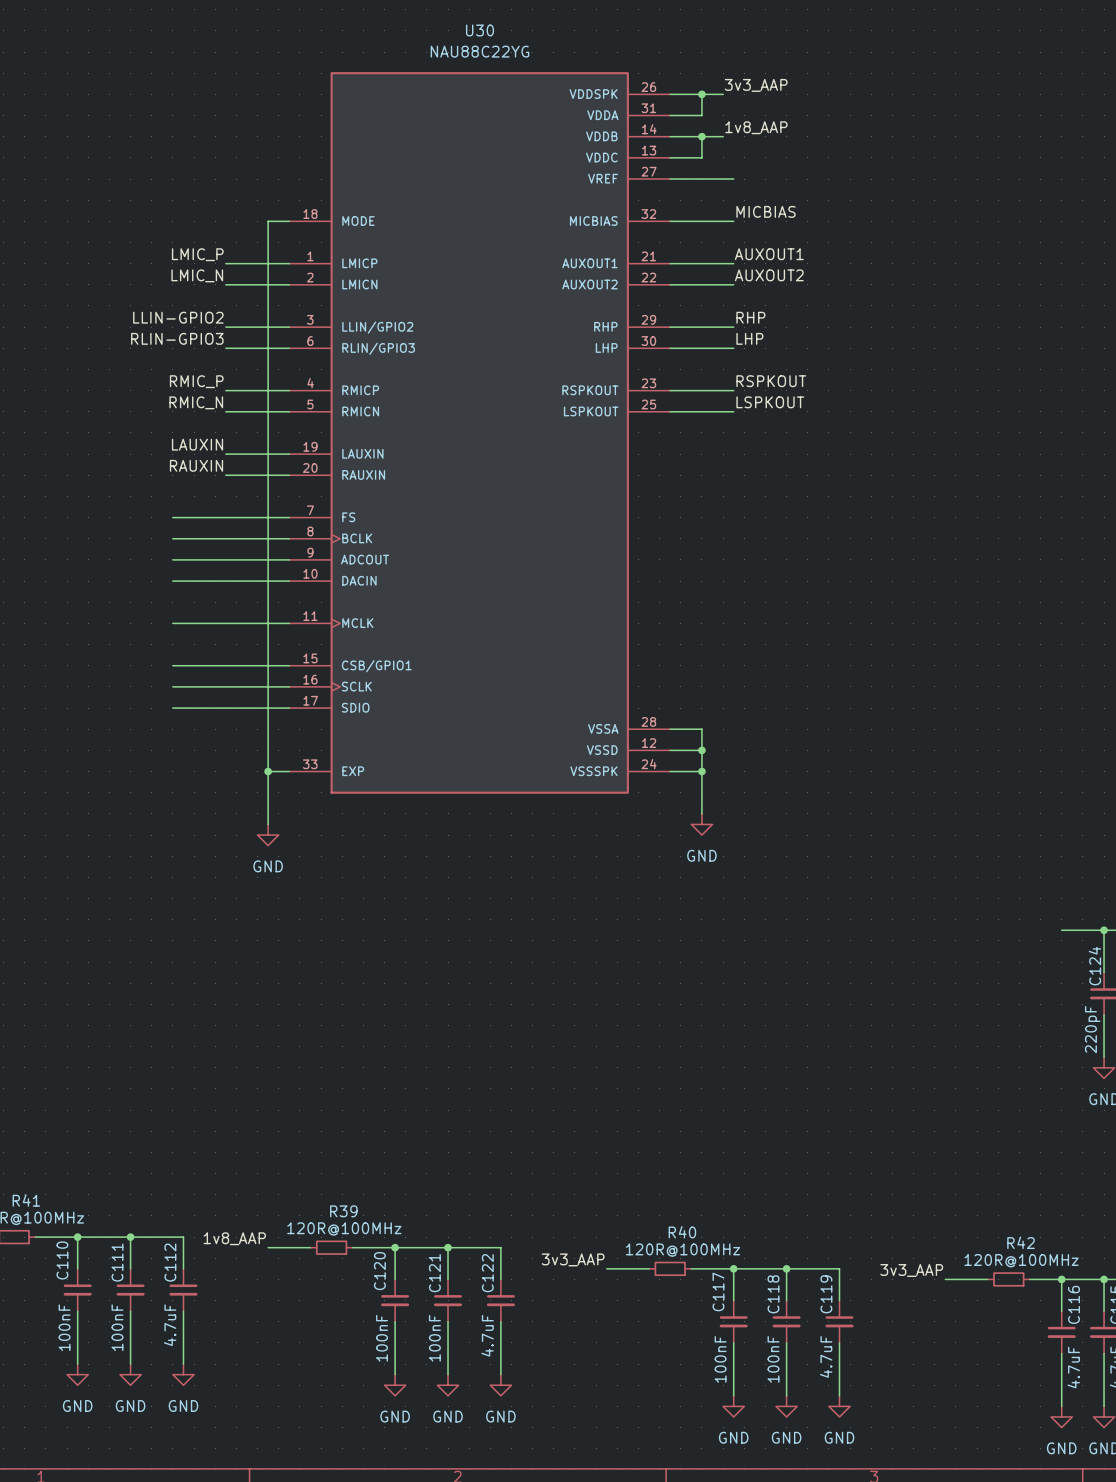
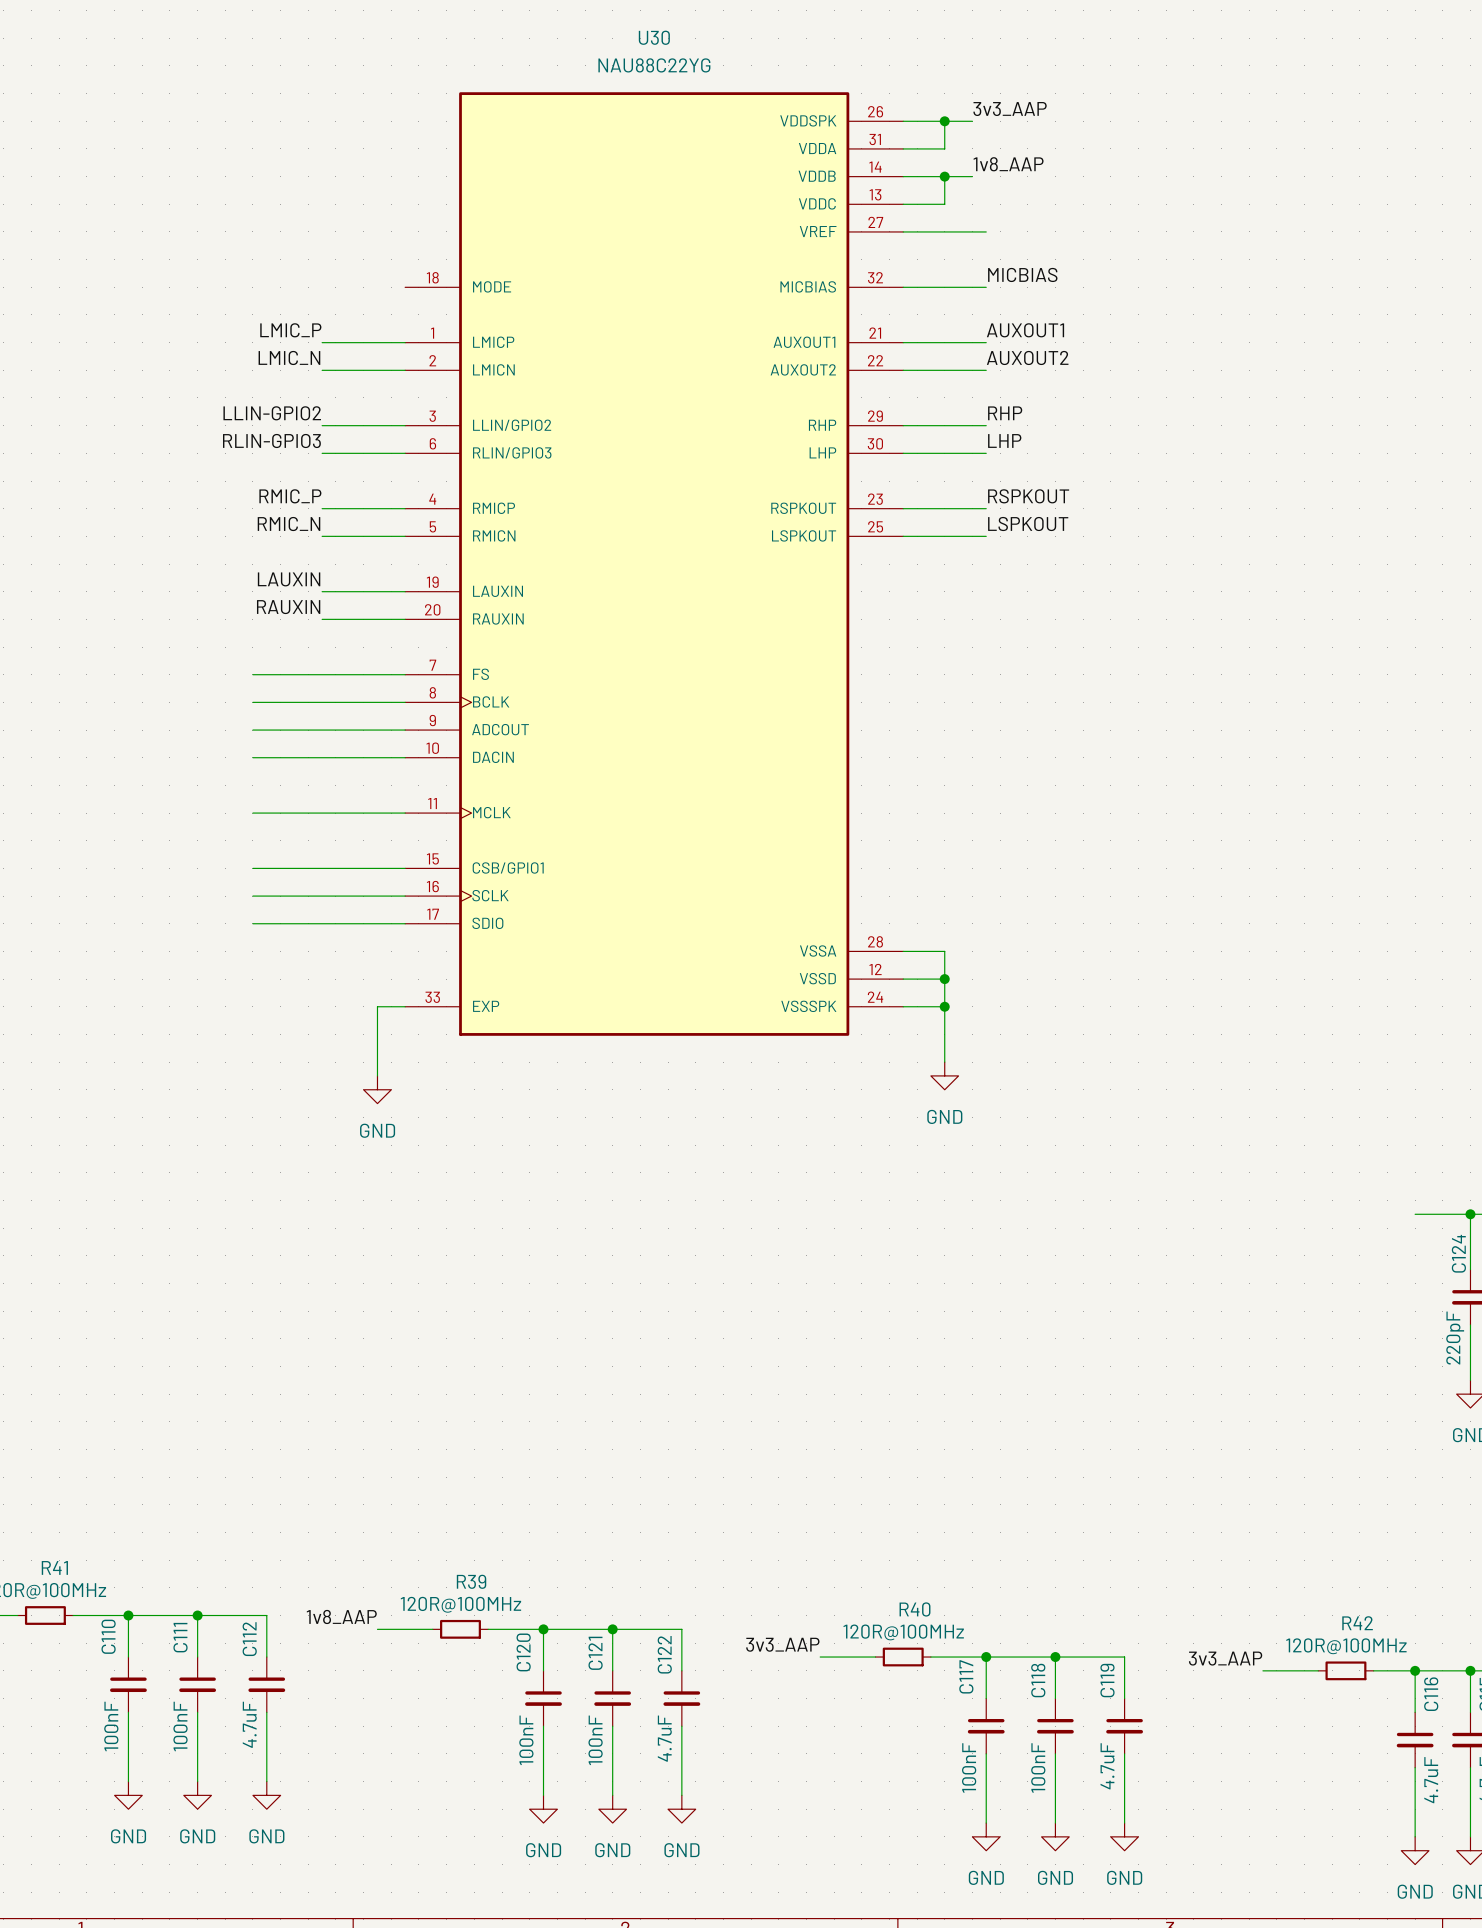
wire: (289, 221) (268, 221) (268, 771) -> none
junction: (268, 771) -> none

